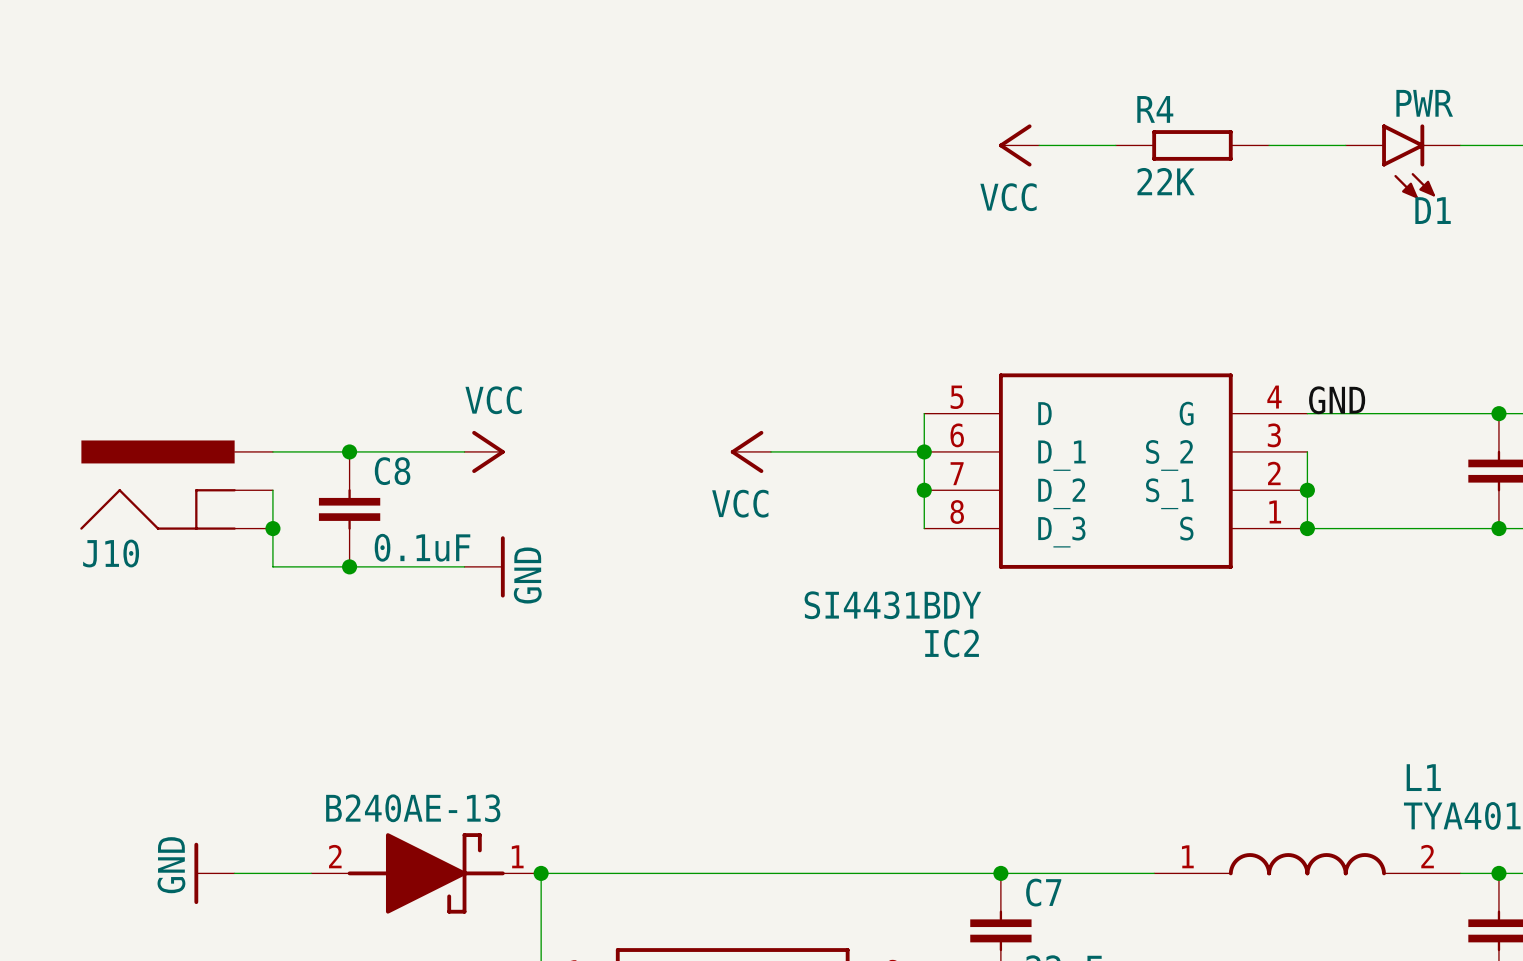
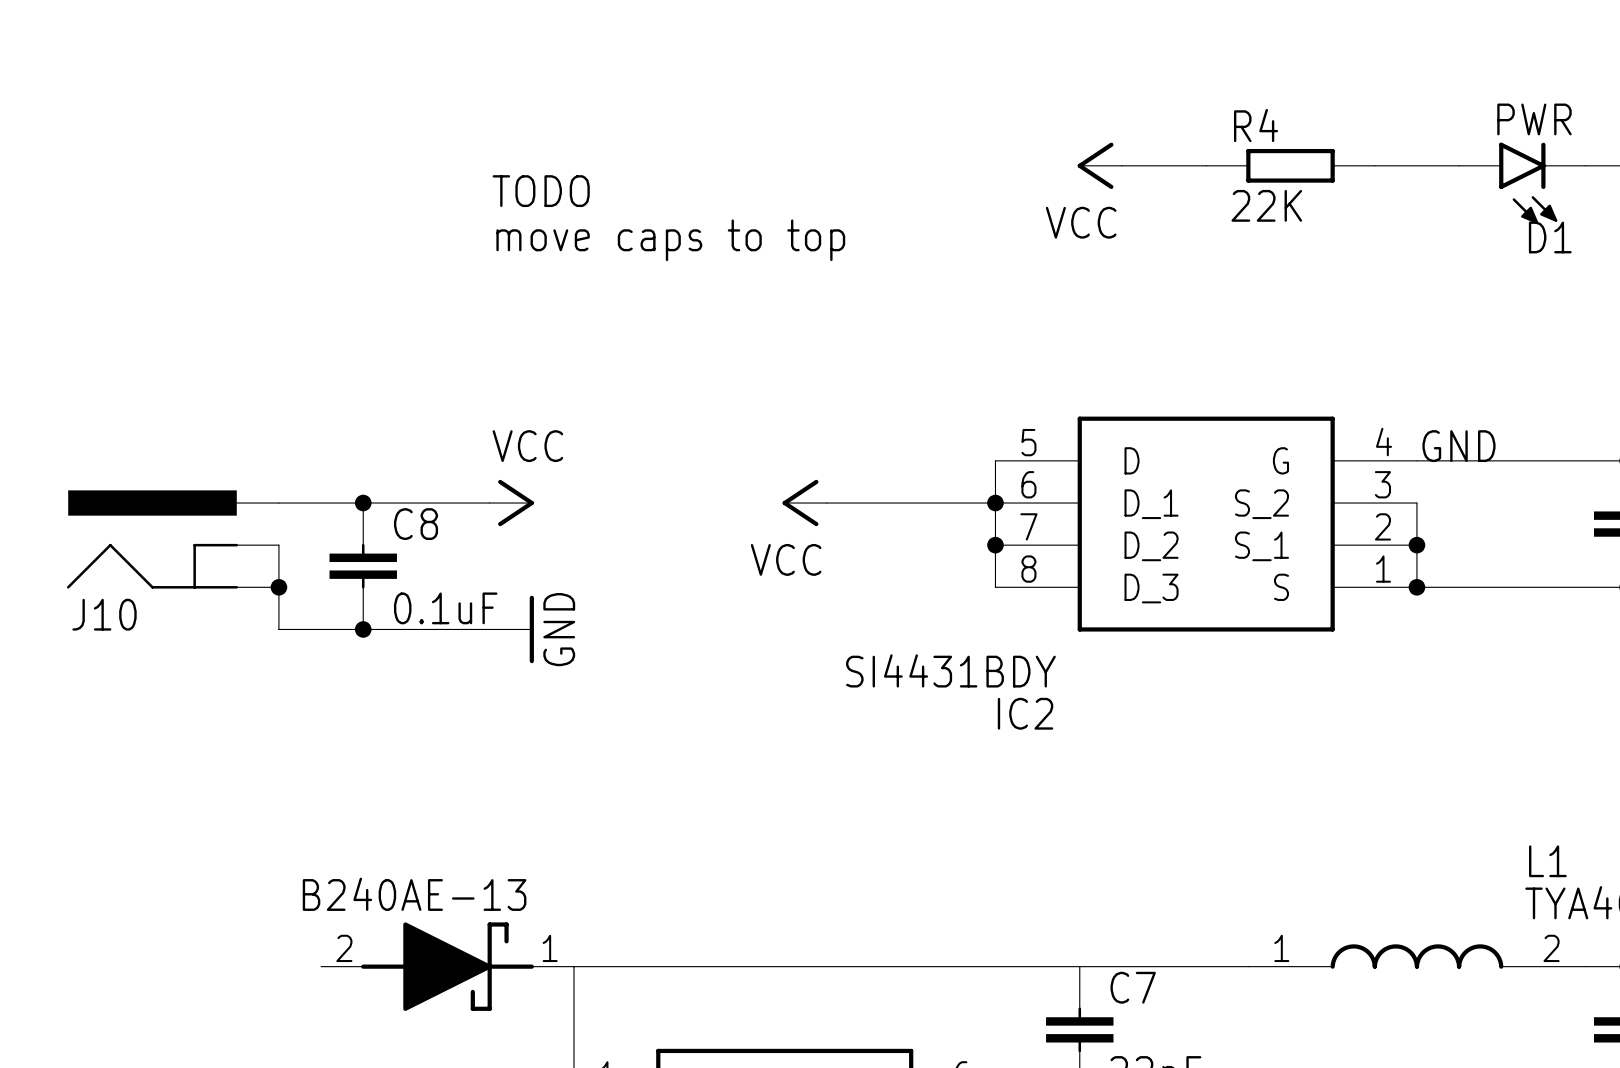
text: none -> TODO (541, 191)
text: none -> move caps to top (670, 240)
power symbol: GND (214, 873) -> none
wire: (234, 873) (311, 873) -> none
junction: (541, 873) -> none
junction: (1000, 873) -> none

